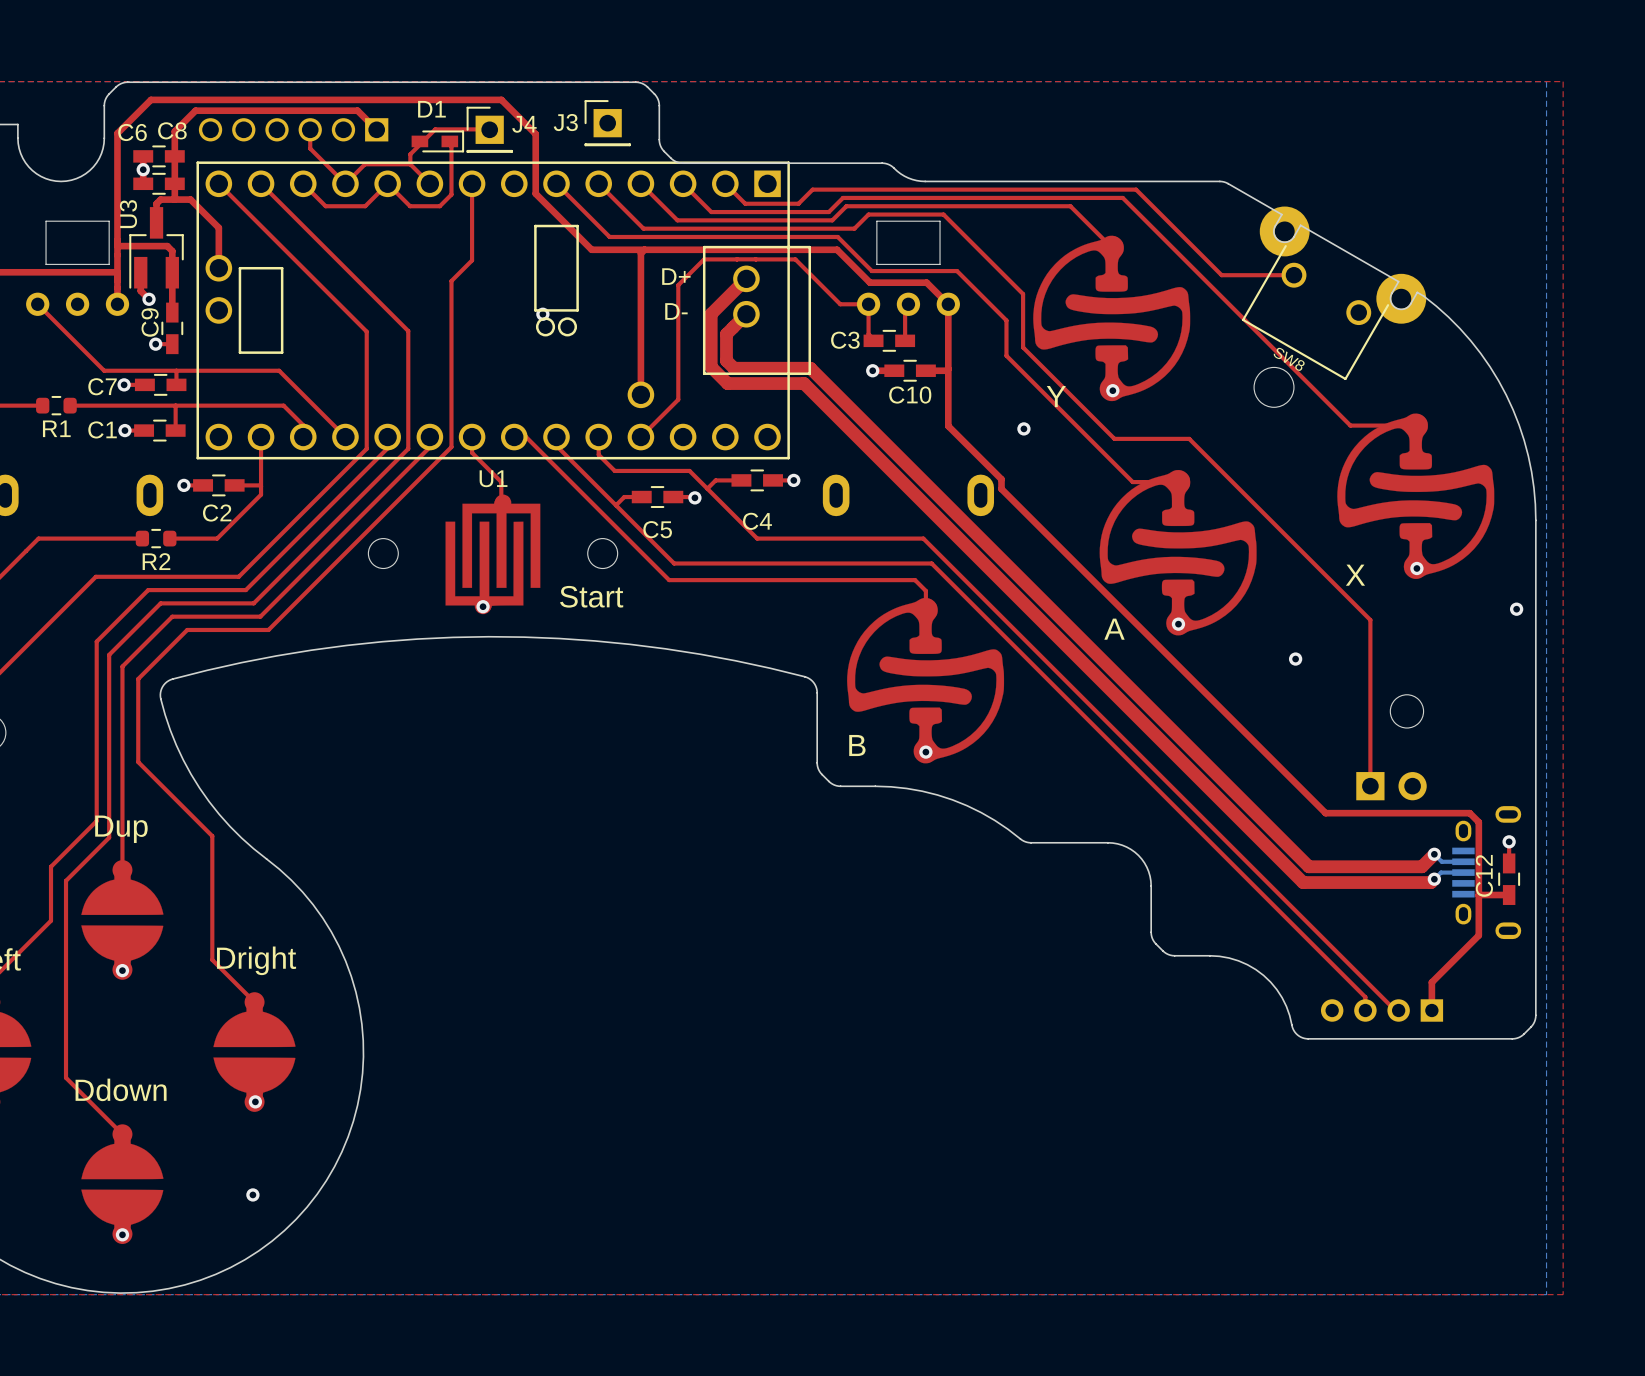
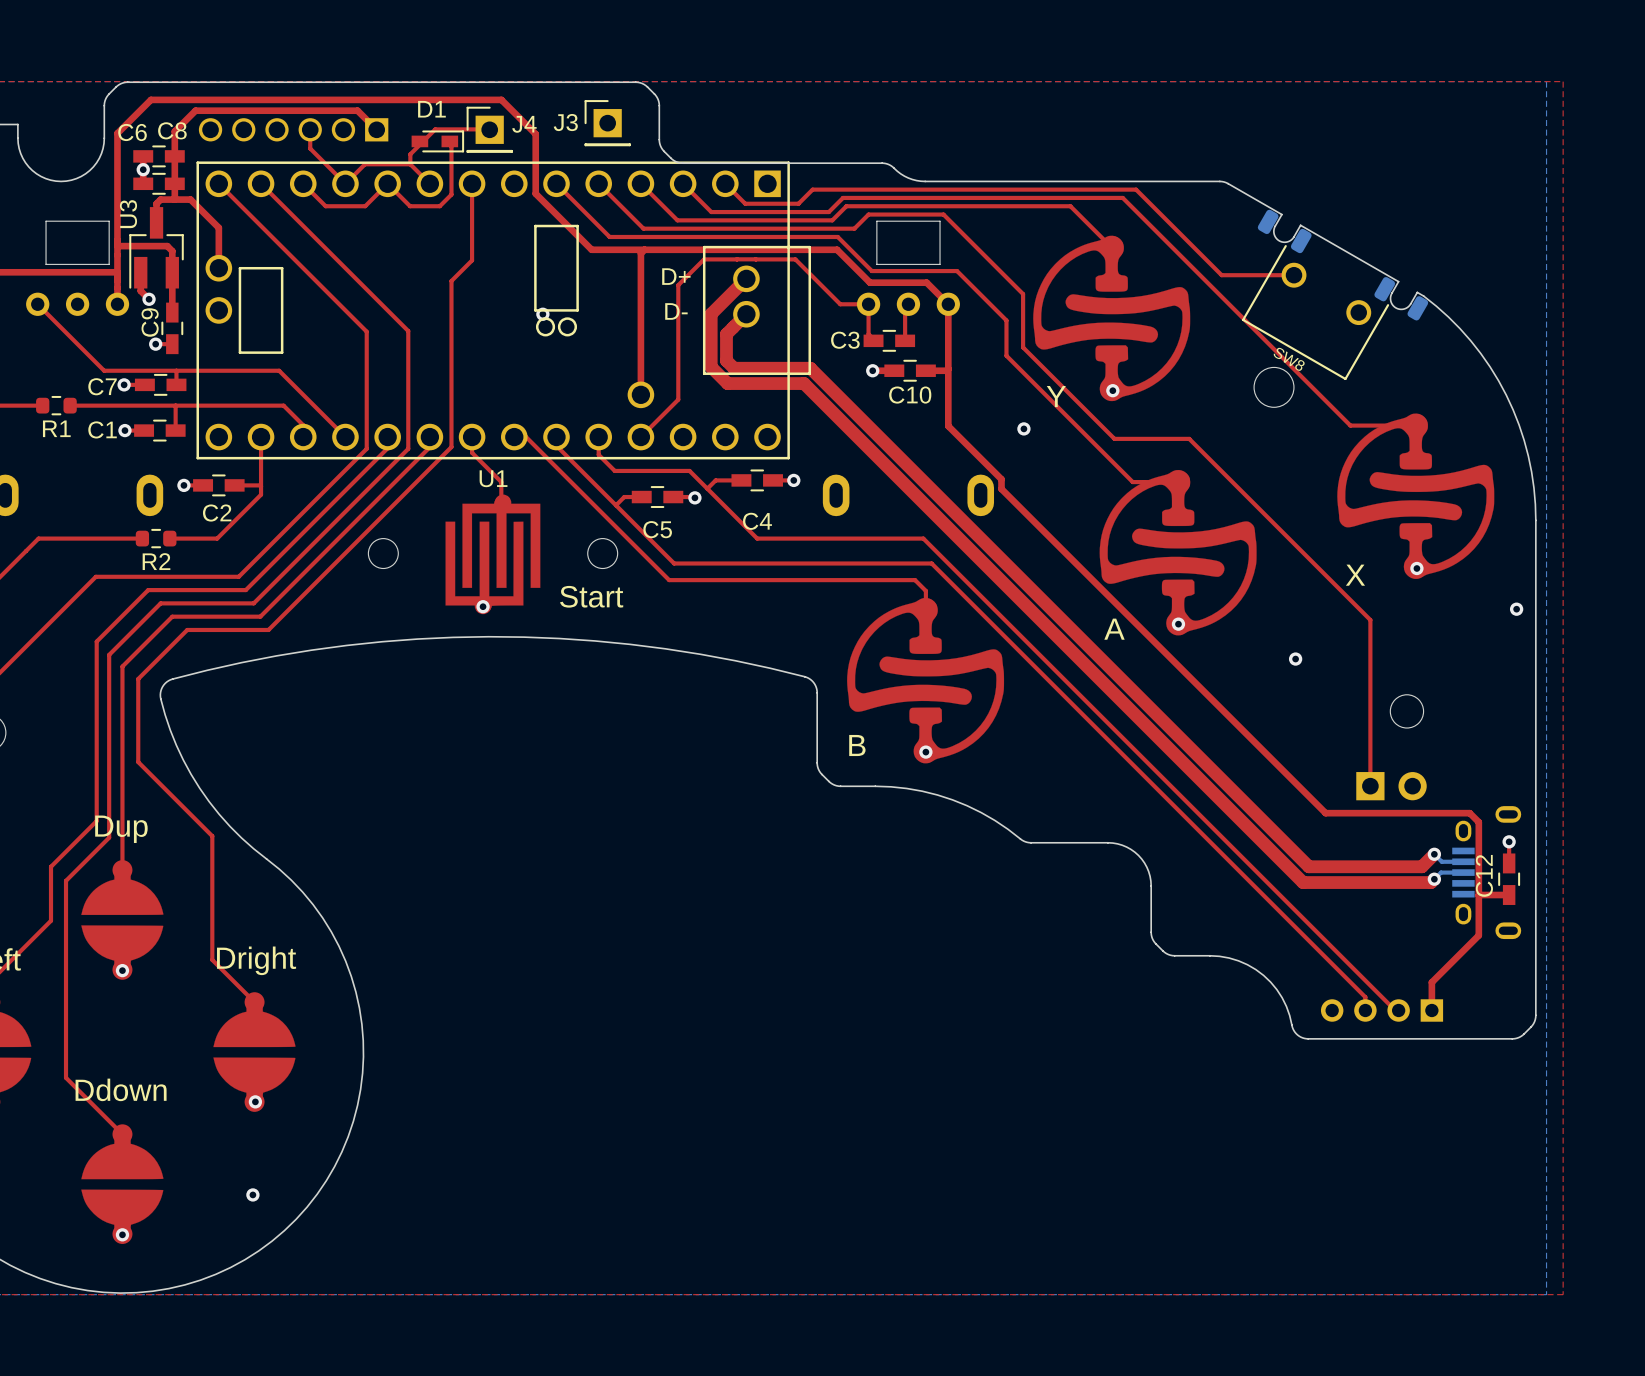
SW8 footprint: [1242, 206, 1427, 381] -> [1242, 209, 1429, 381]

